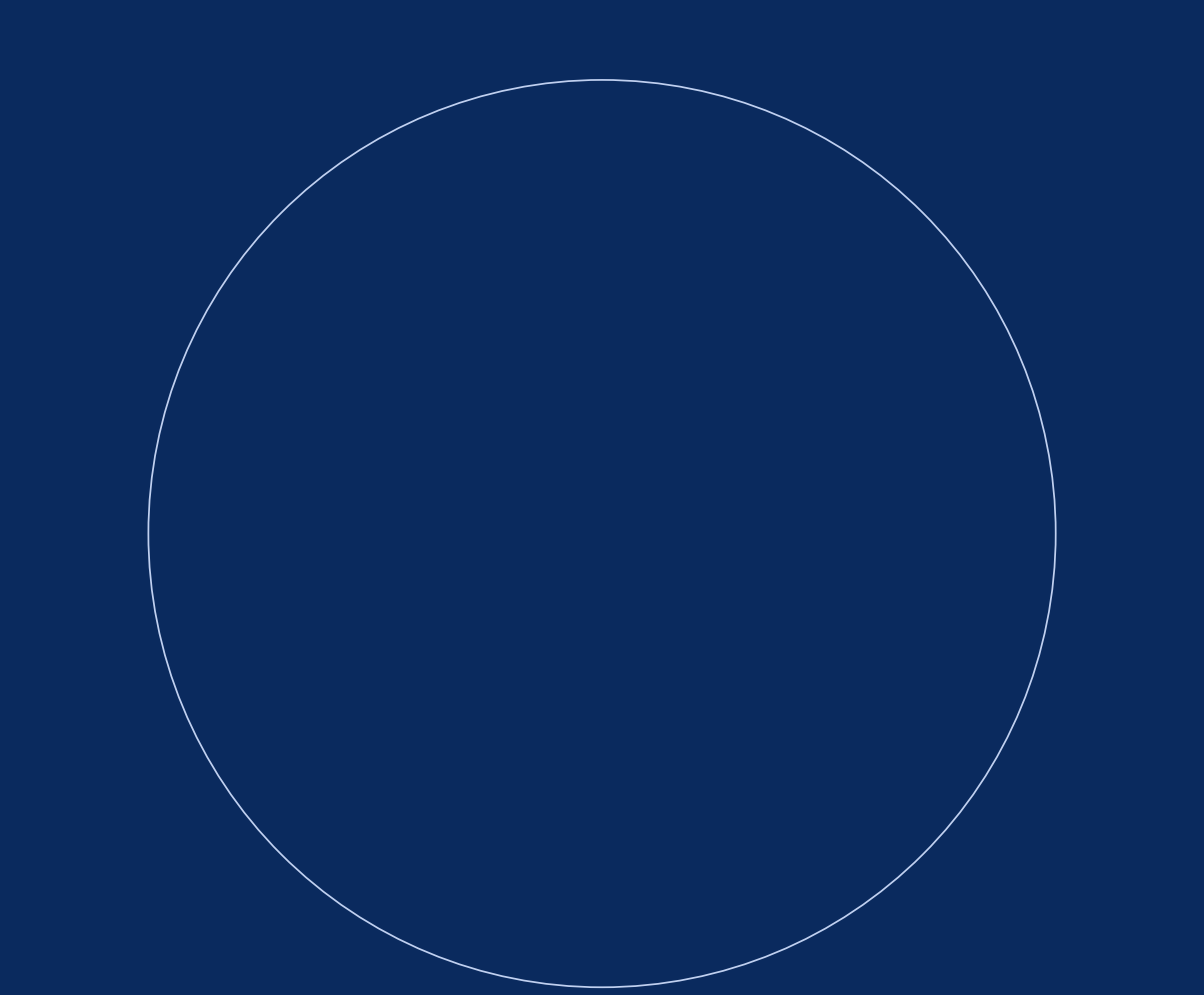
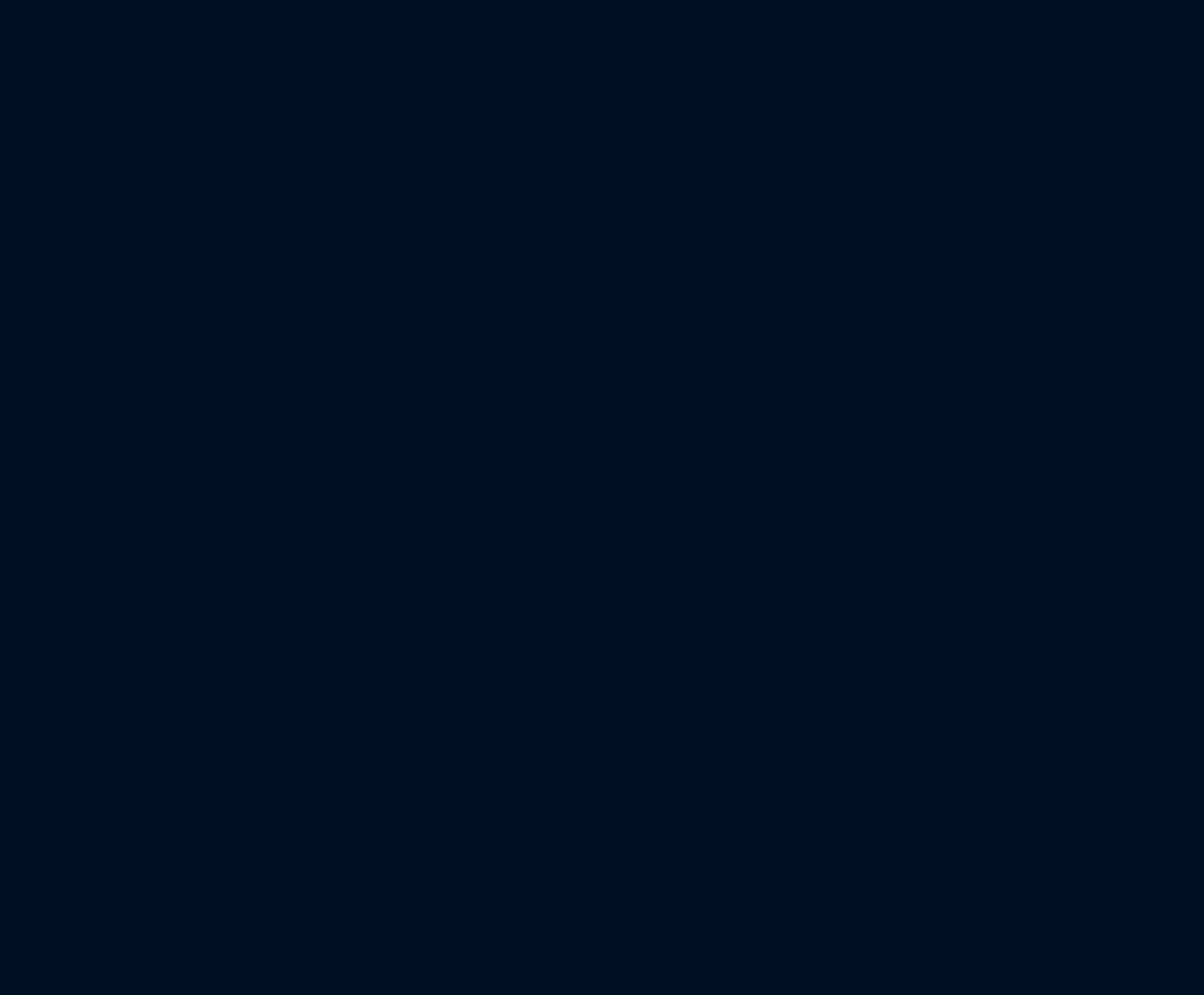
round board edge: [147, 79, 1057, 989] -> none

